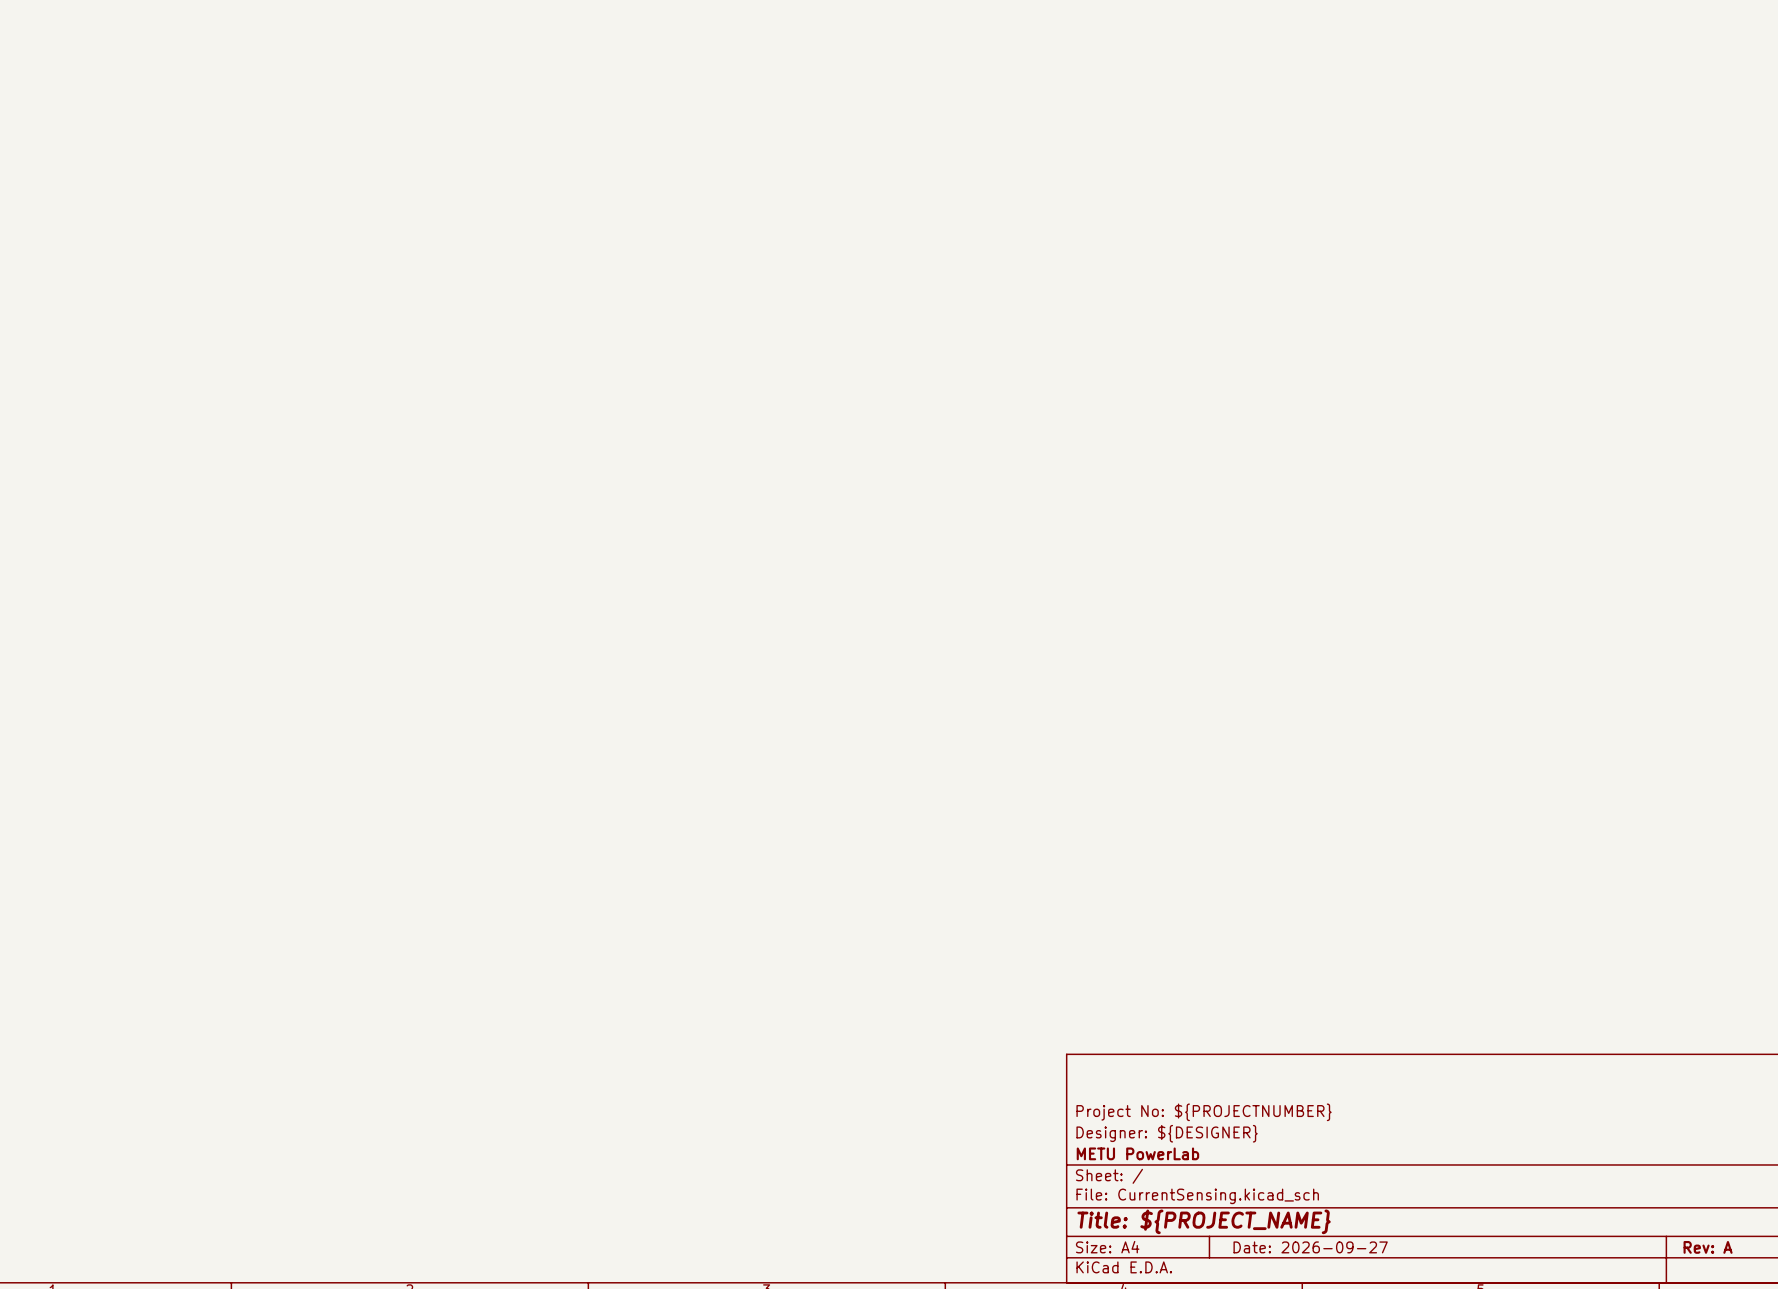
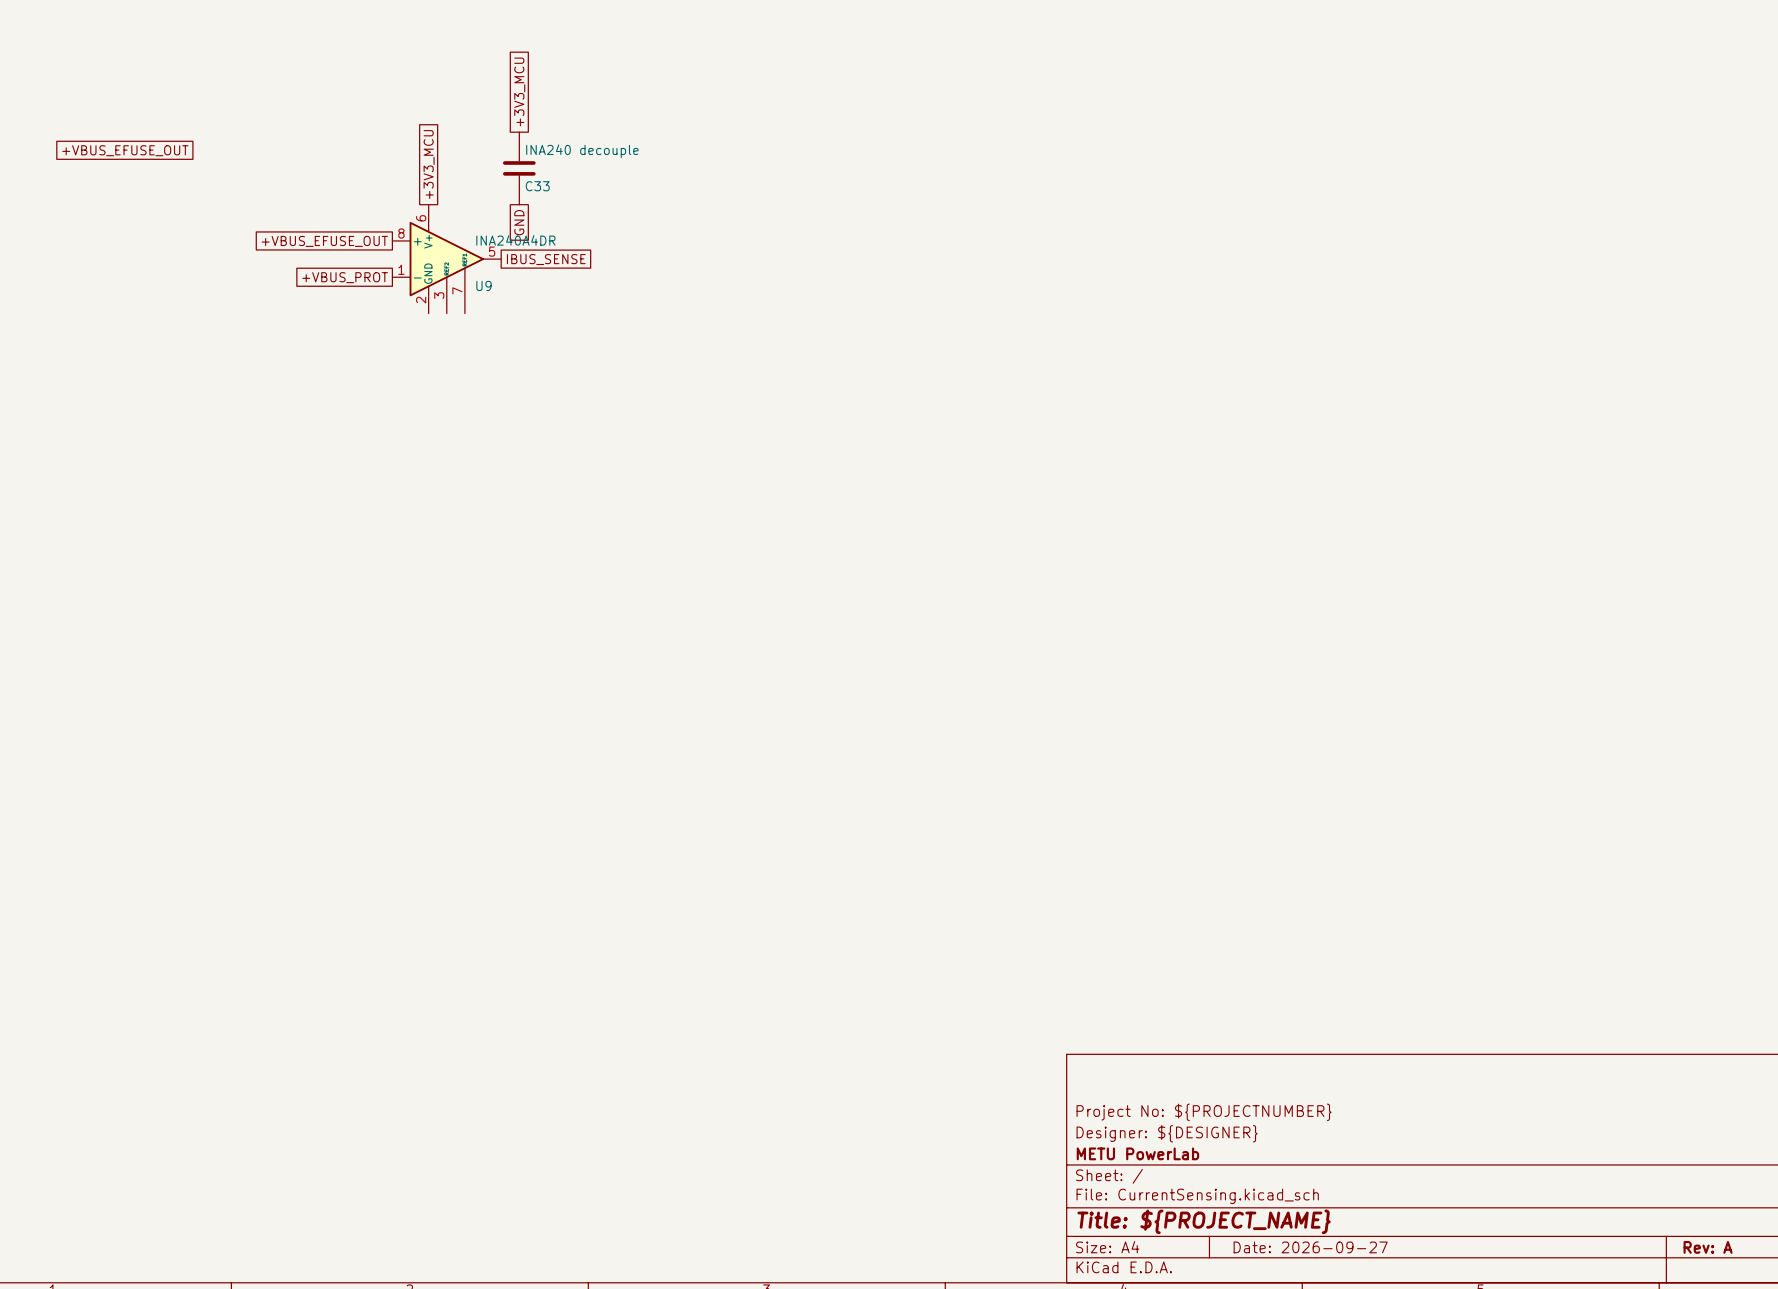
global label: none -> +3V3_MCU (519, 92)
global label: none -> +VBUS_EFUSE_OUT (125, 150)
global label: none -> +3V3_MCU (429, 164)
C33: none -> INA240 decouple (519, 168)
global label: none -> GND (519, 222)
global label: none -> +VBUS_EFUSE_OUT (324, 241)
U9: none -> INA240A4DR (446, 259)
global label: none -> IBUS_SENSE (546, 259)
global label: none -> +VBUS_PROT (345, 277)

